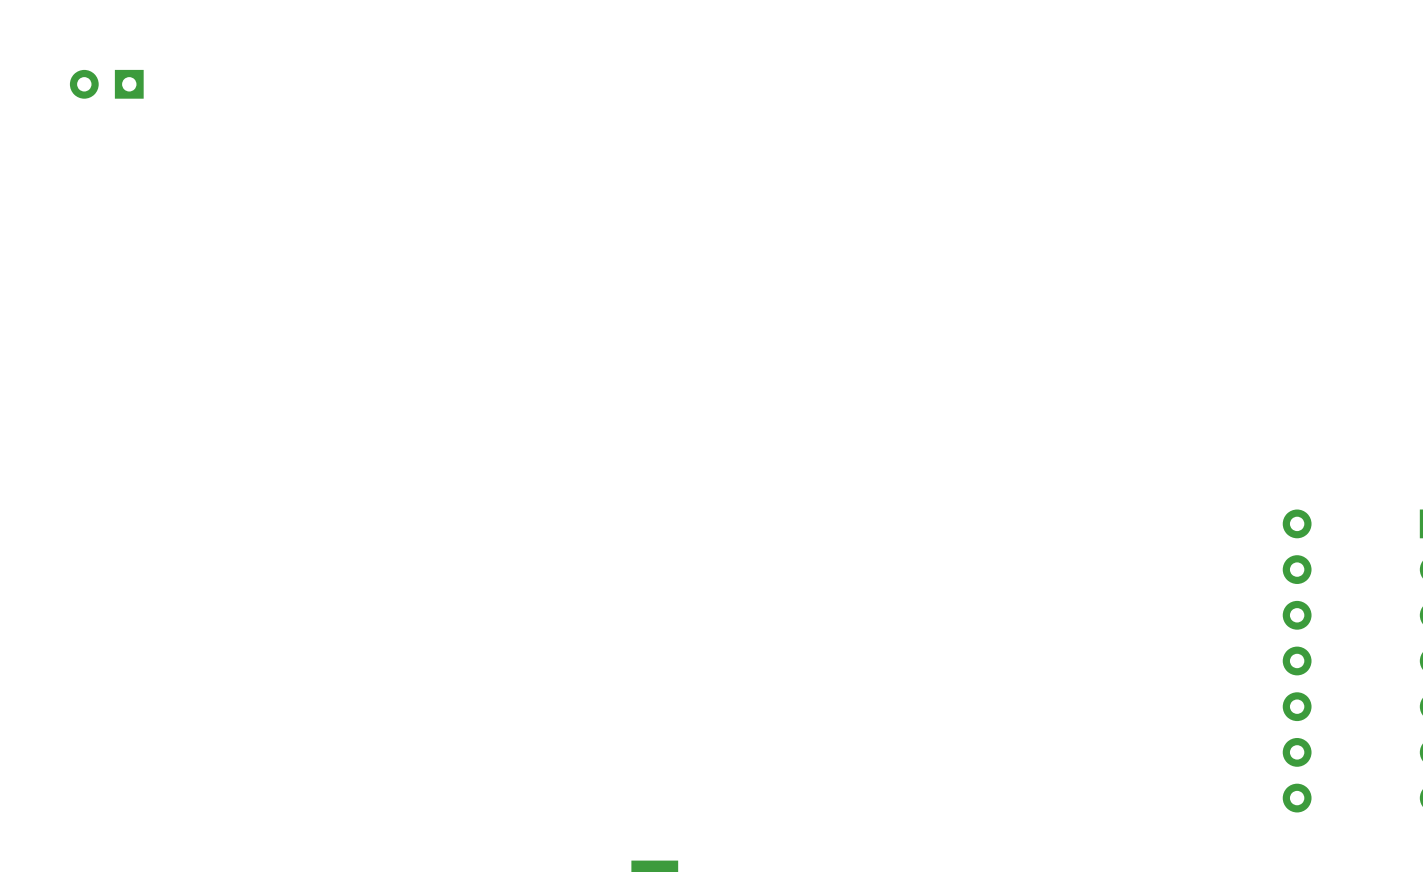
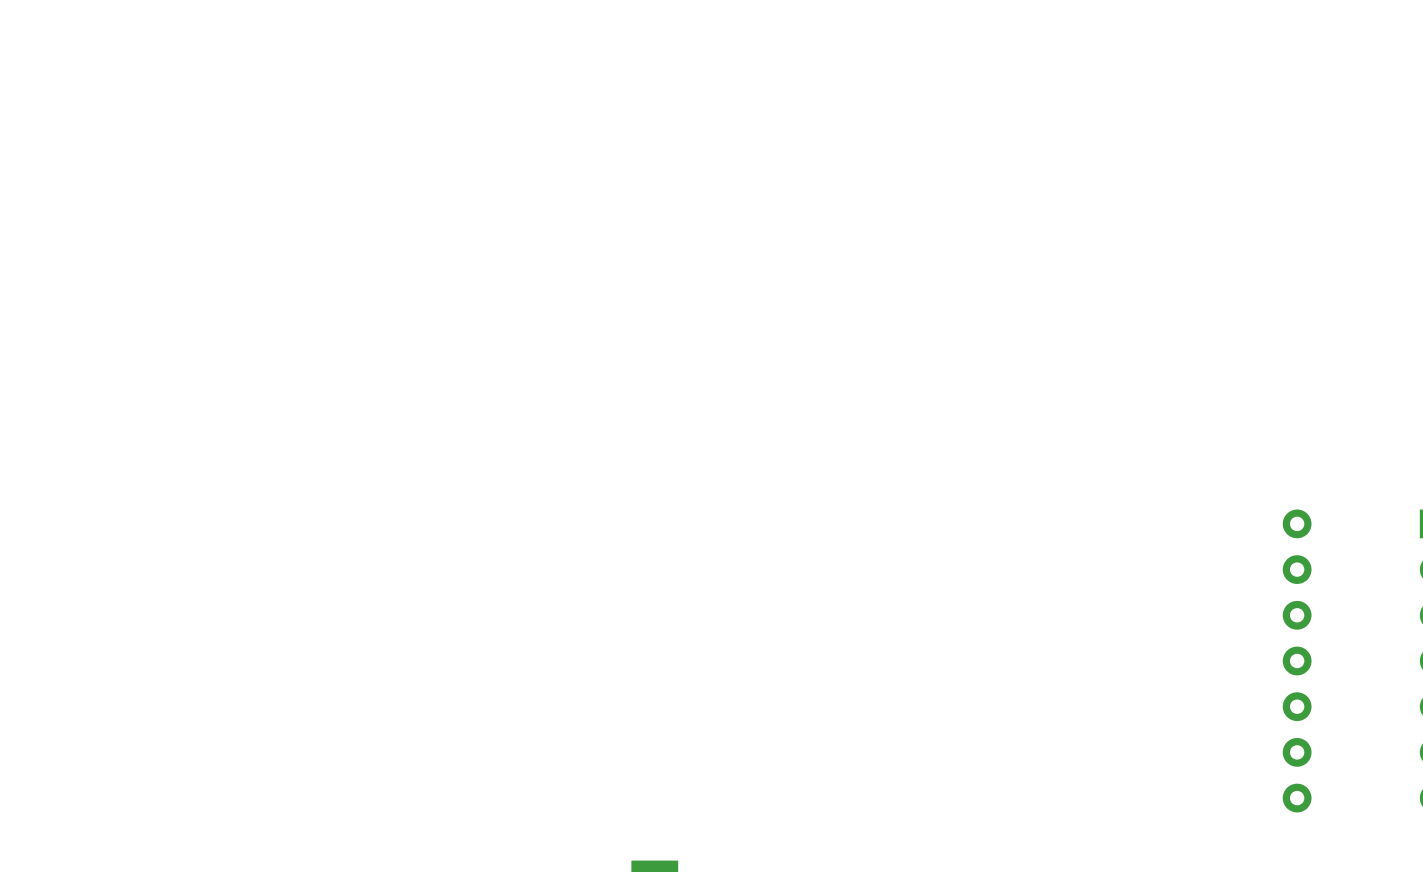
part: (106, 84) -> none

